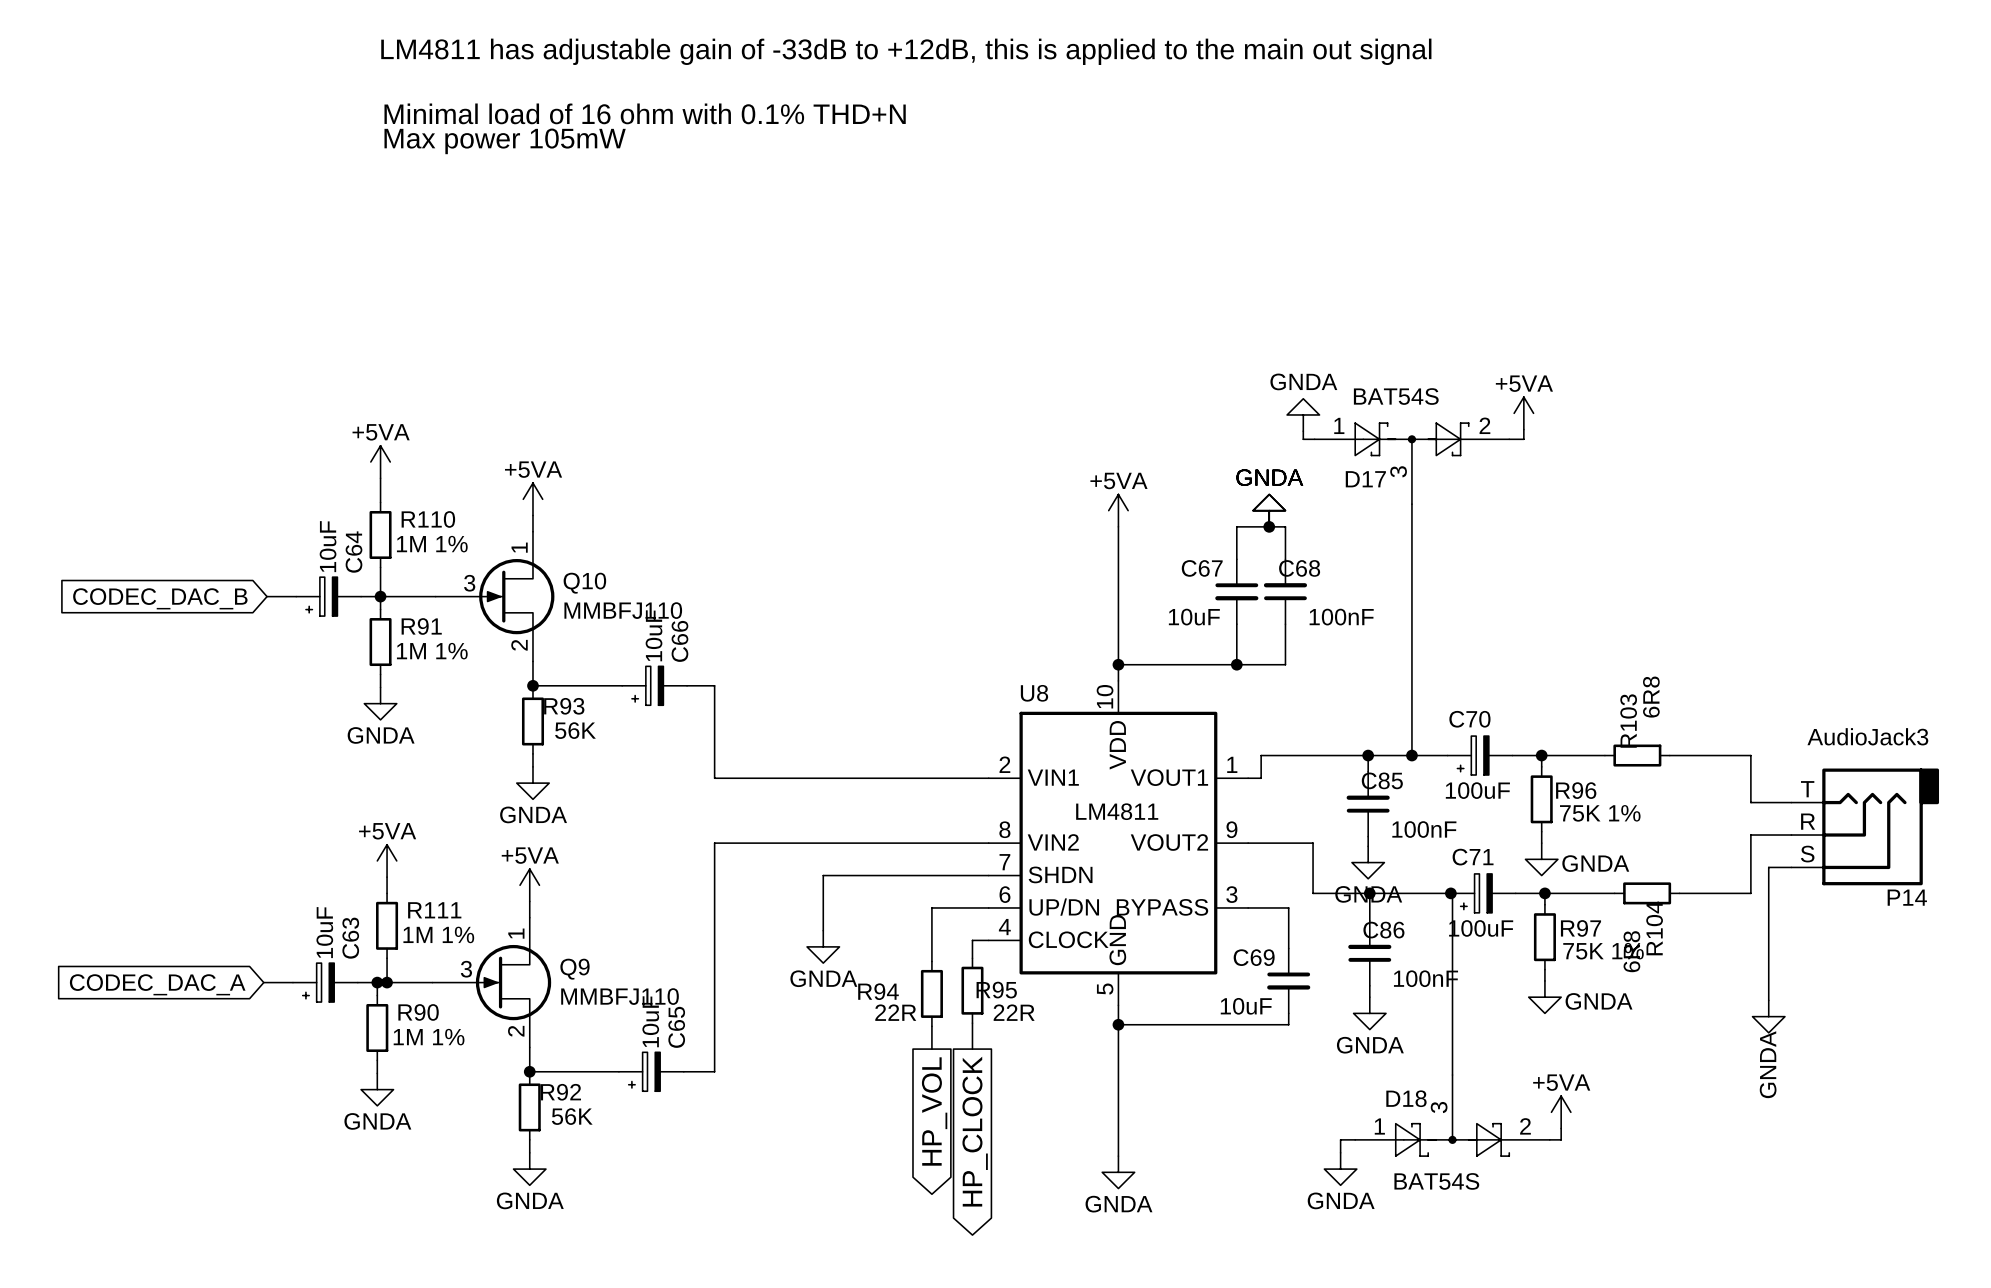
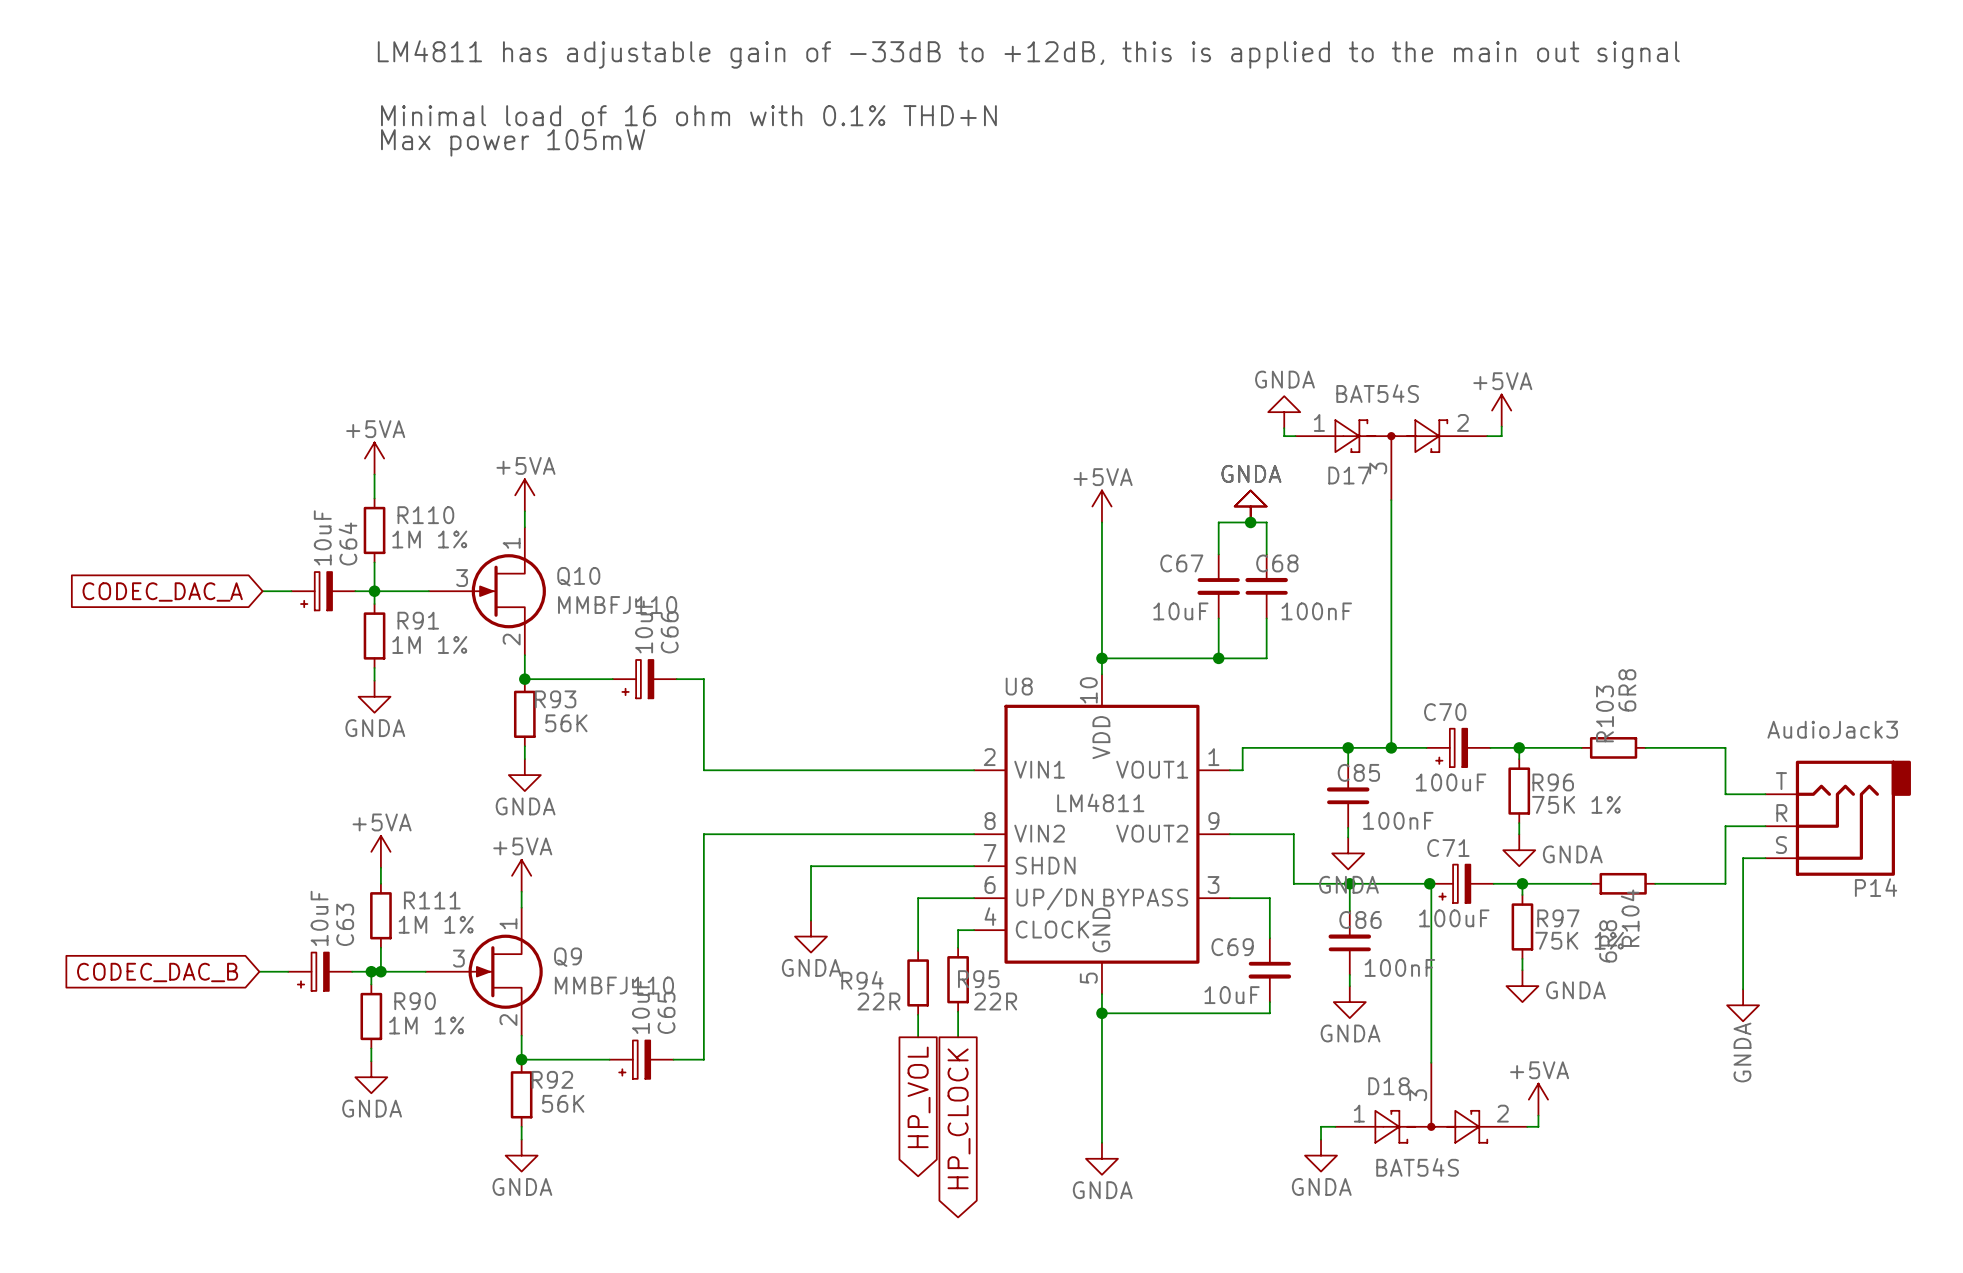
global label: CODEC_DAC_B (160, 598) -> CODEC_DAC_A (162, 591)
global label: CODEC_DAC_A (157, 984) -> CODEC_DAC_B (157, 972)

